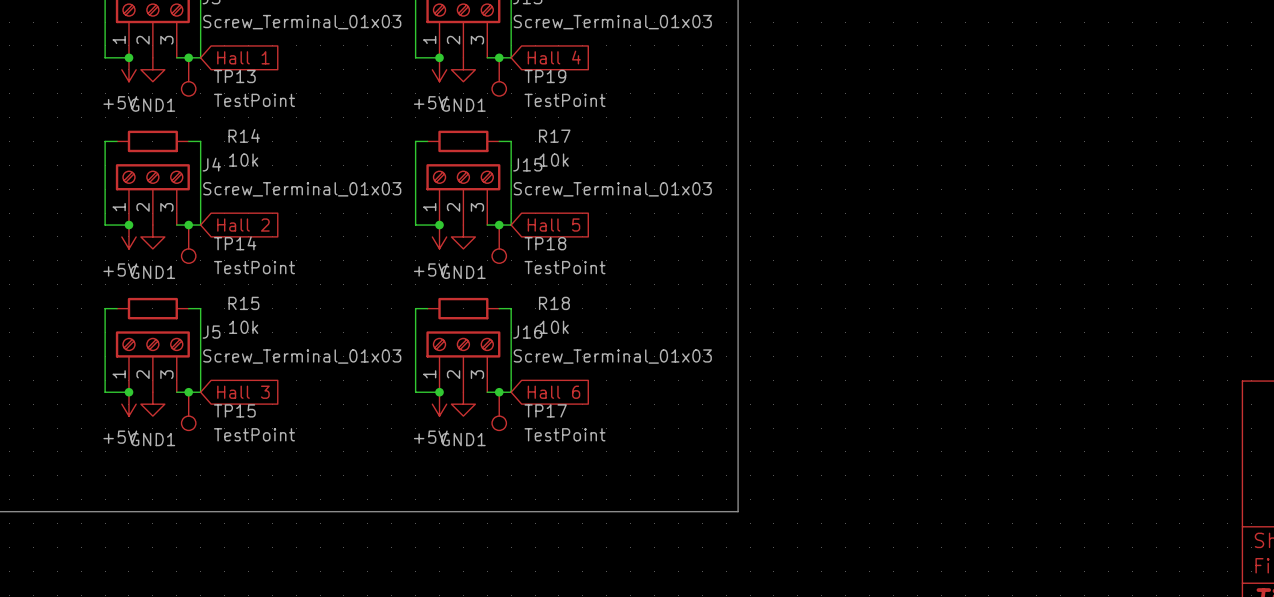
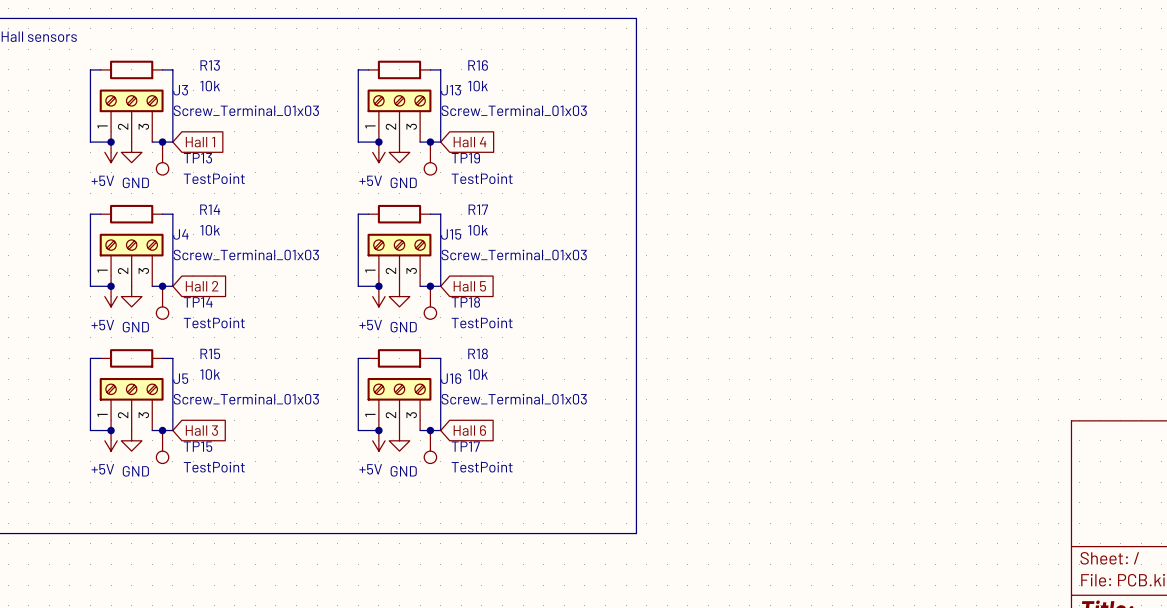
power symbol: GND1 (152, 69) -> GND (131, 152)
power symbol: GND1 (463, 69) -> GND (399, 152)
power symbol: GND1 (152, 236) -> GND (131, 296)
power symbol: GND1 (463, 236) -> GND (399, 296)
power symbol: GND1 (152, 404) -> GND (131, 440)
power symbol: GND1 (463, 404) -> GND (399, 440)

